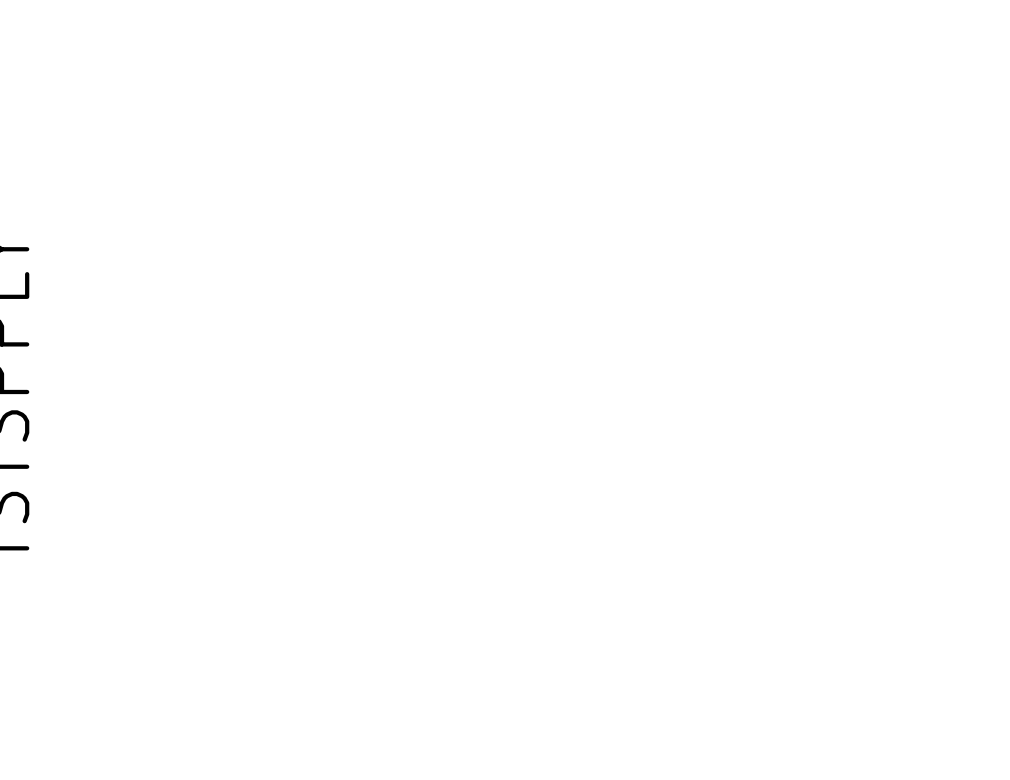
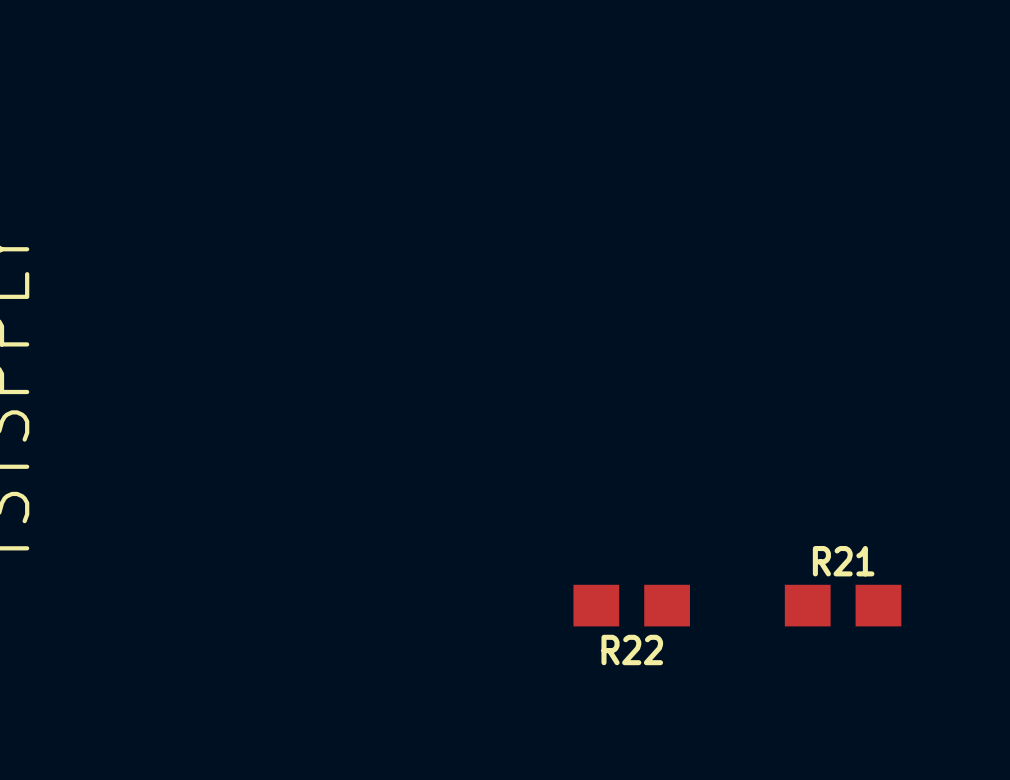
R22: none -> (631, 605)
R21: none -> (843, 605)

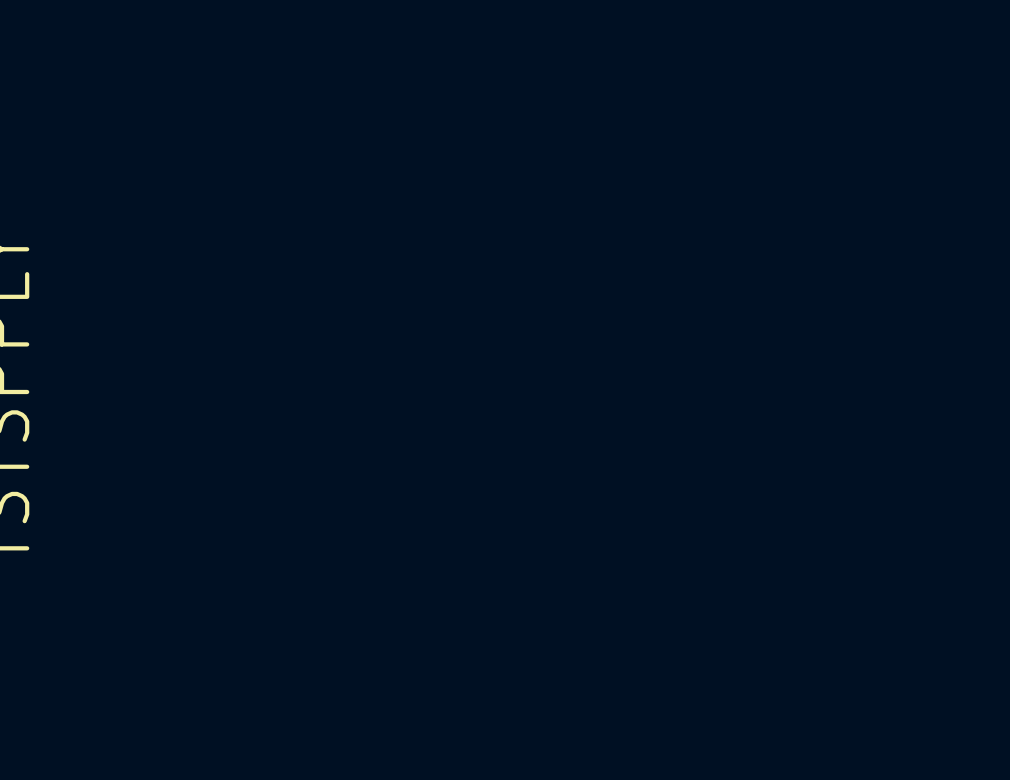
R22: (631, 605) -> none
R21: (843, 605) -> none

